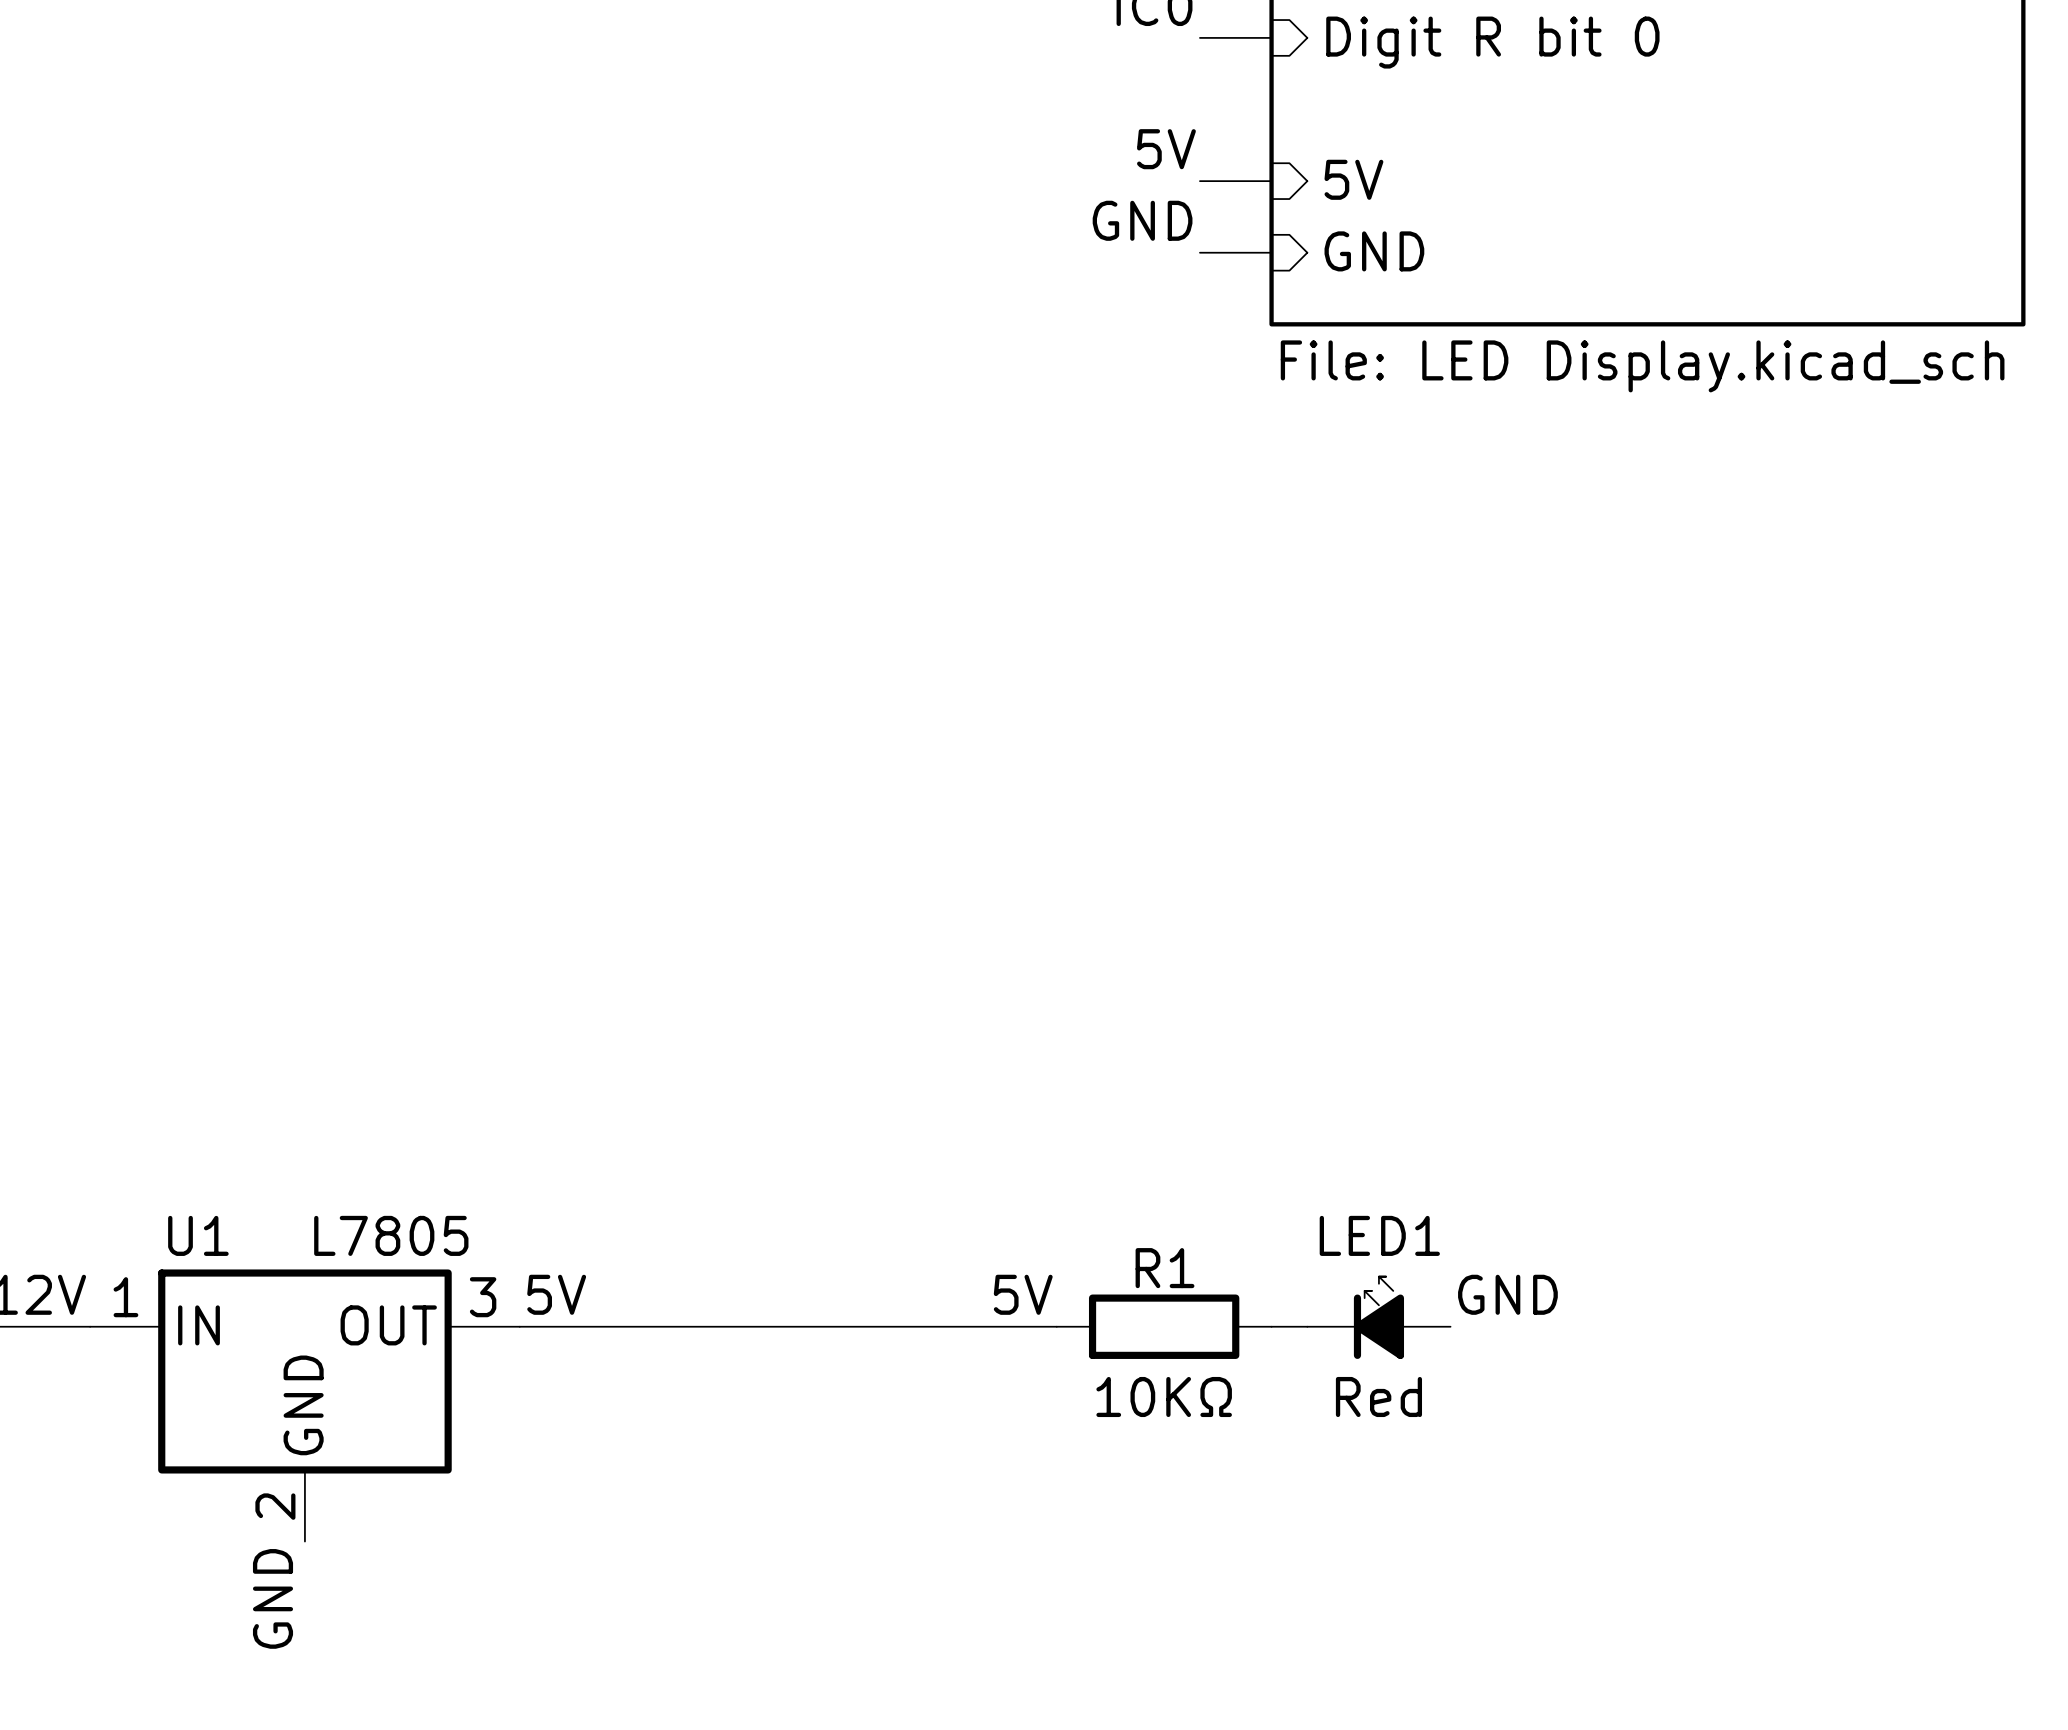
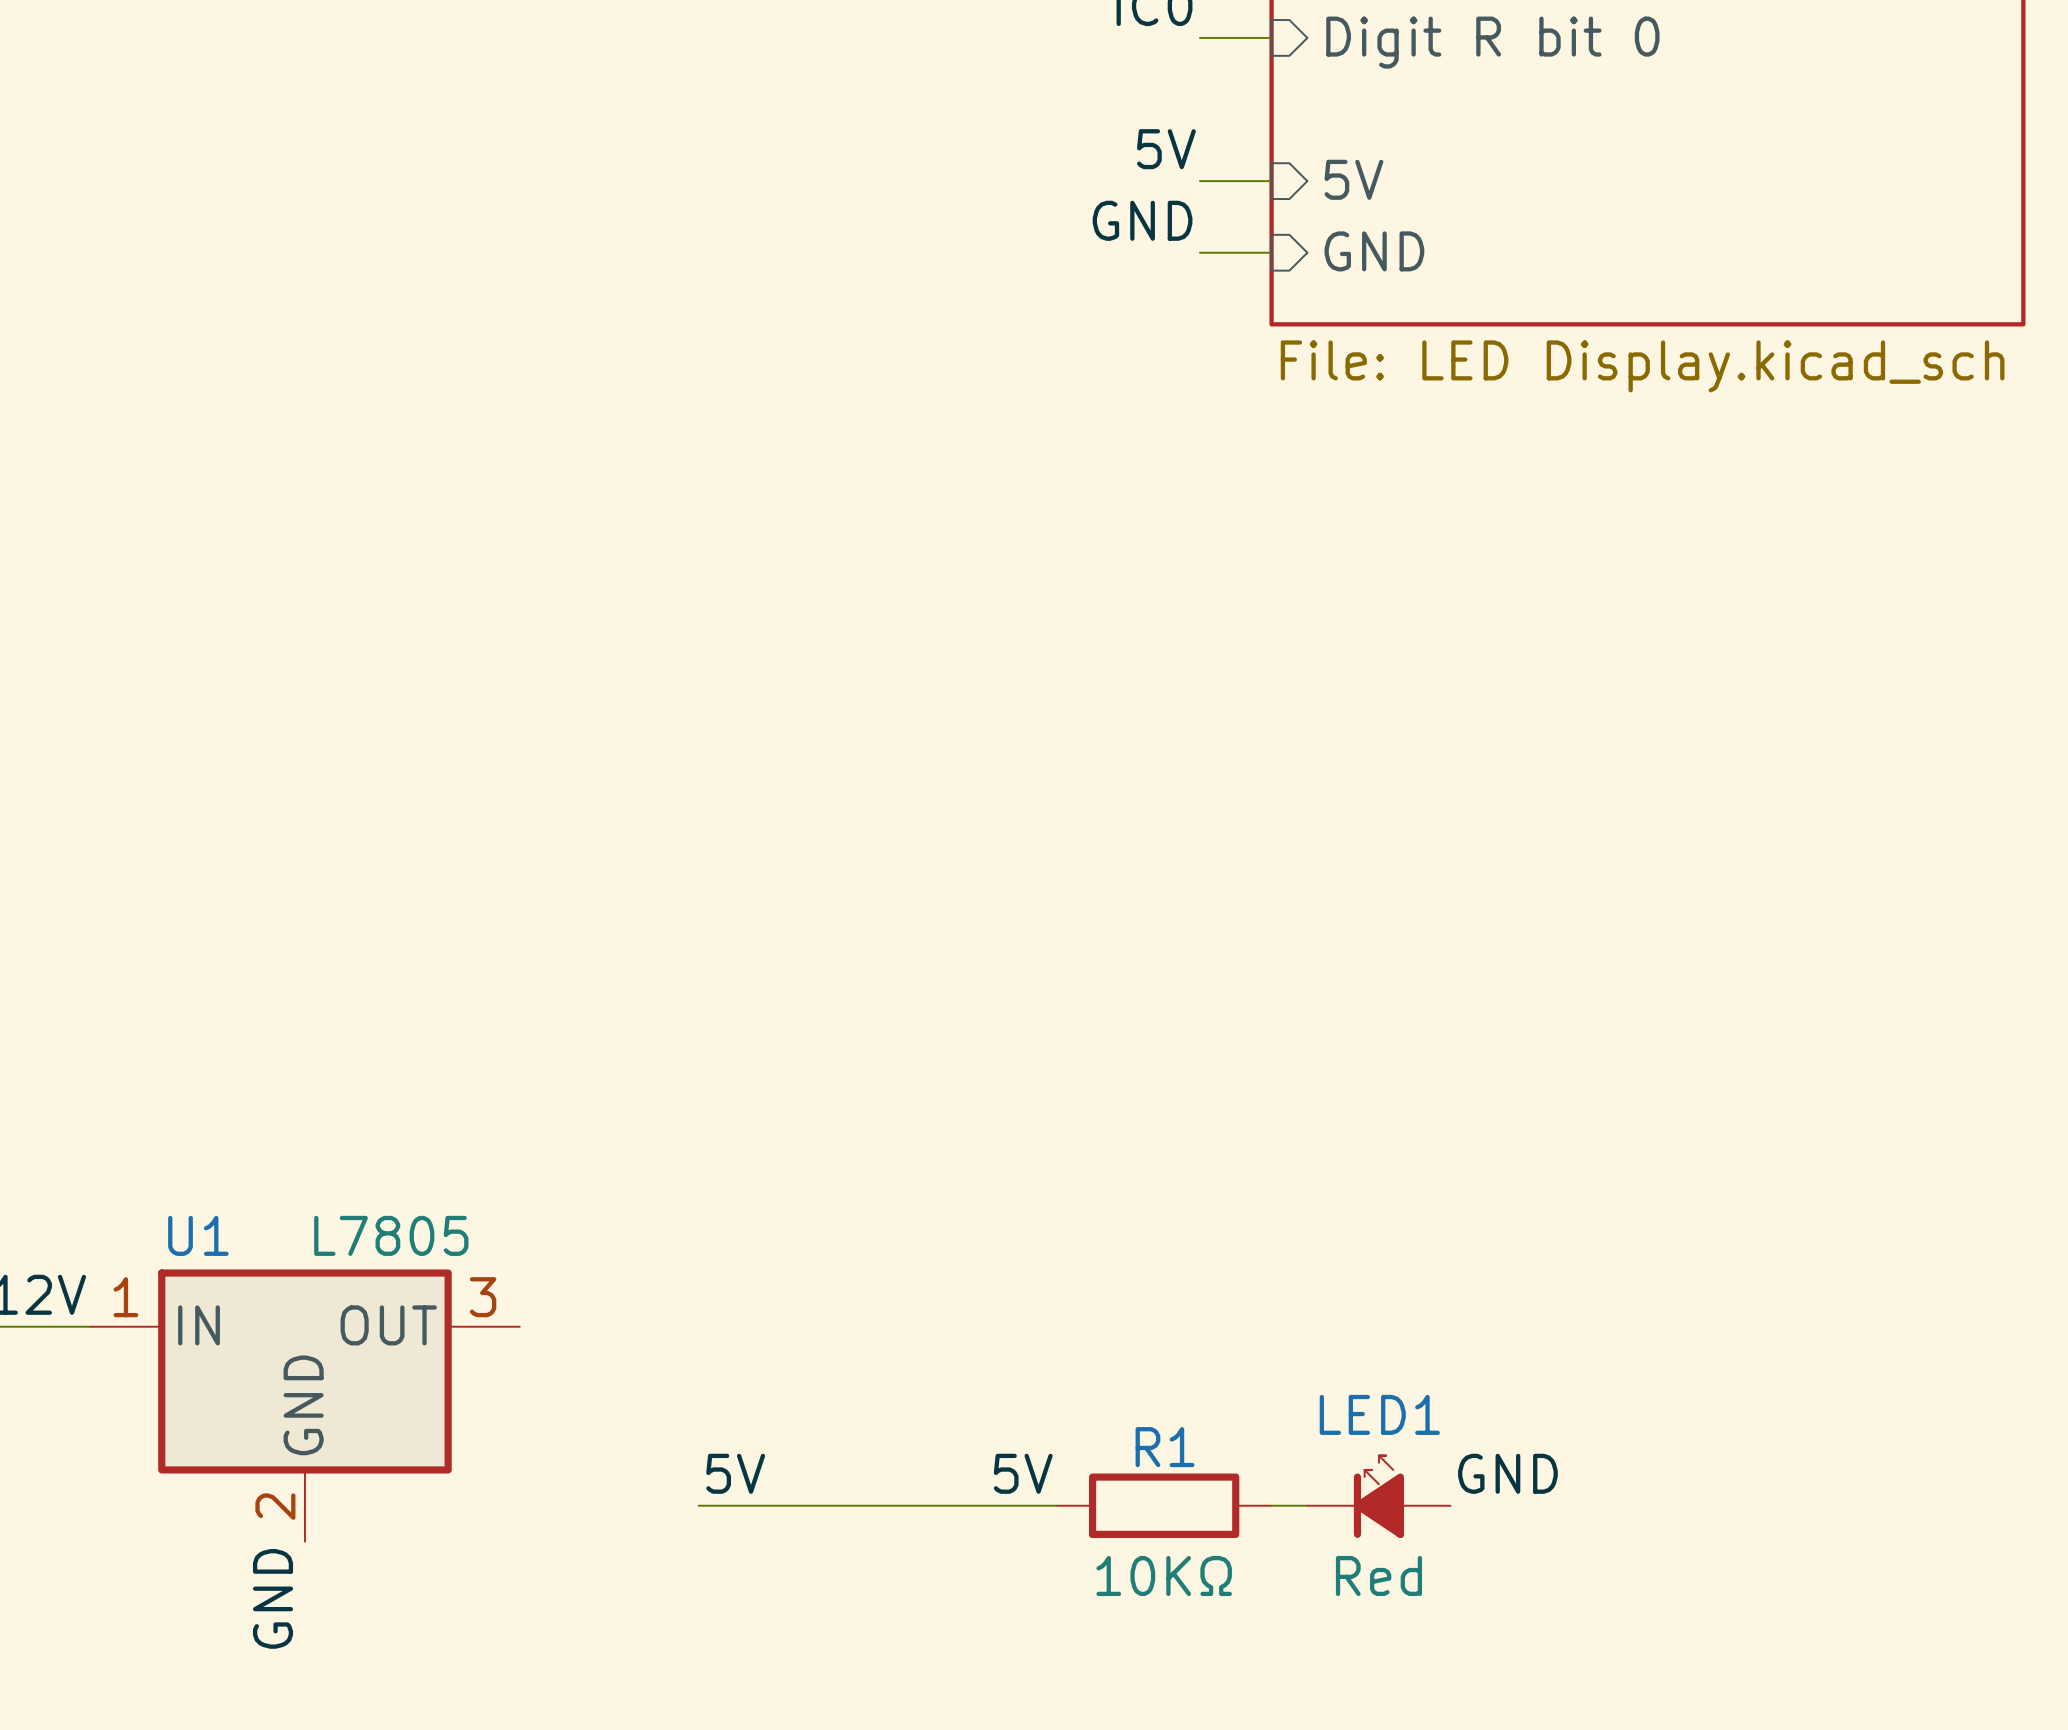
label: 5V (556, 1294) -> none
label position: 5V (1023, 1294) -> 5V (1023, 1473)
label position: GND (1507, 1294) -> GND (1507, 1473)
LED1 position: (1378, 1317) -> (1378, 1496)
wire: (519, 1326) (1056, 1326) -> none
R1 position: (1164, 1326) -> (1164, 1505)
wire: (1271, 1326) (1307, 1326) -> (1271, 1505) (1307, 1505)
label: none -> 5V (735, 1473)
wire: none -> (698, 1505) (1056, 1505)

